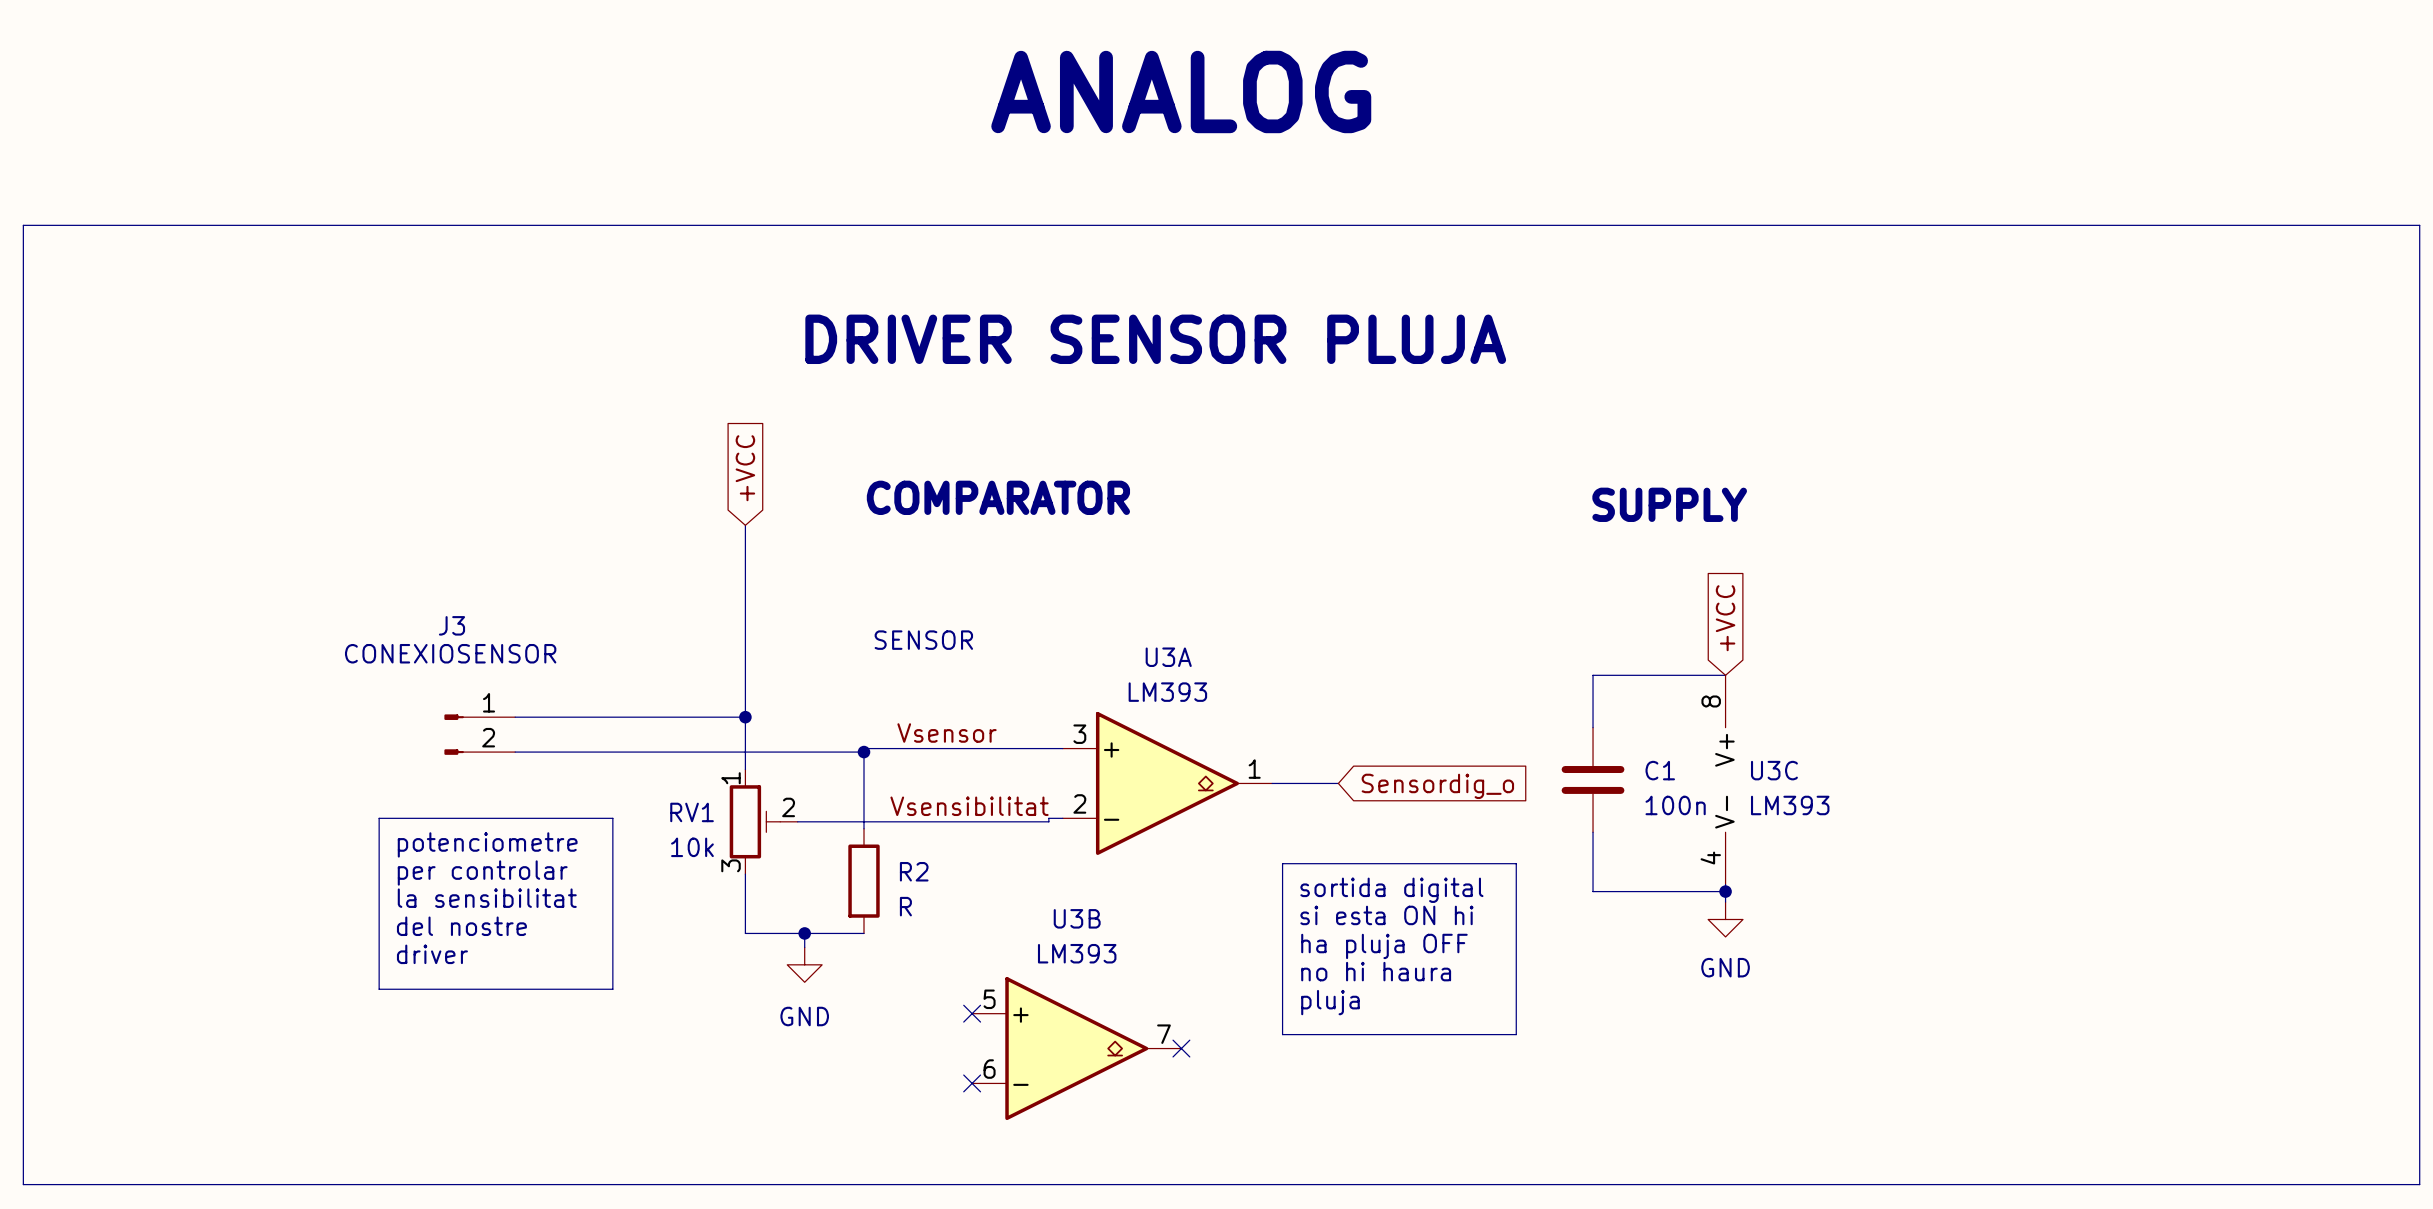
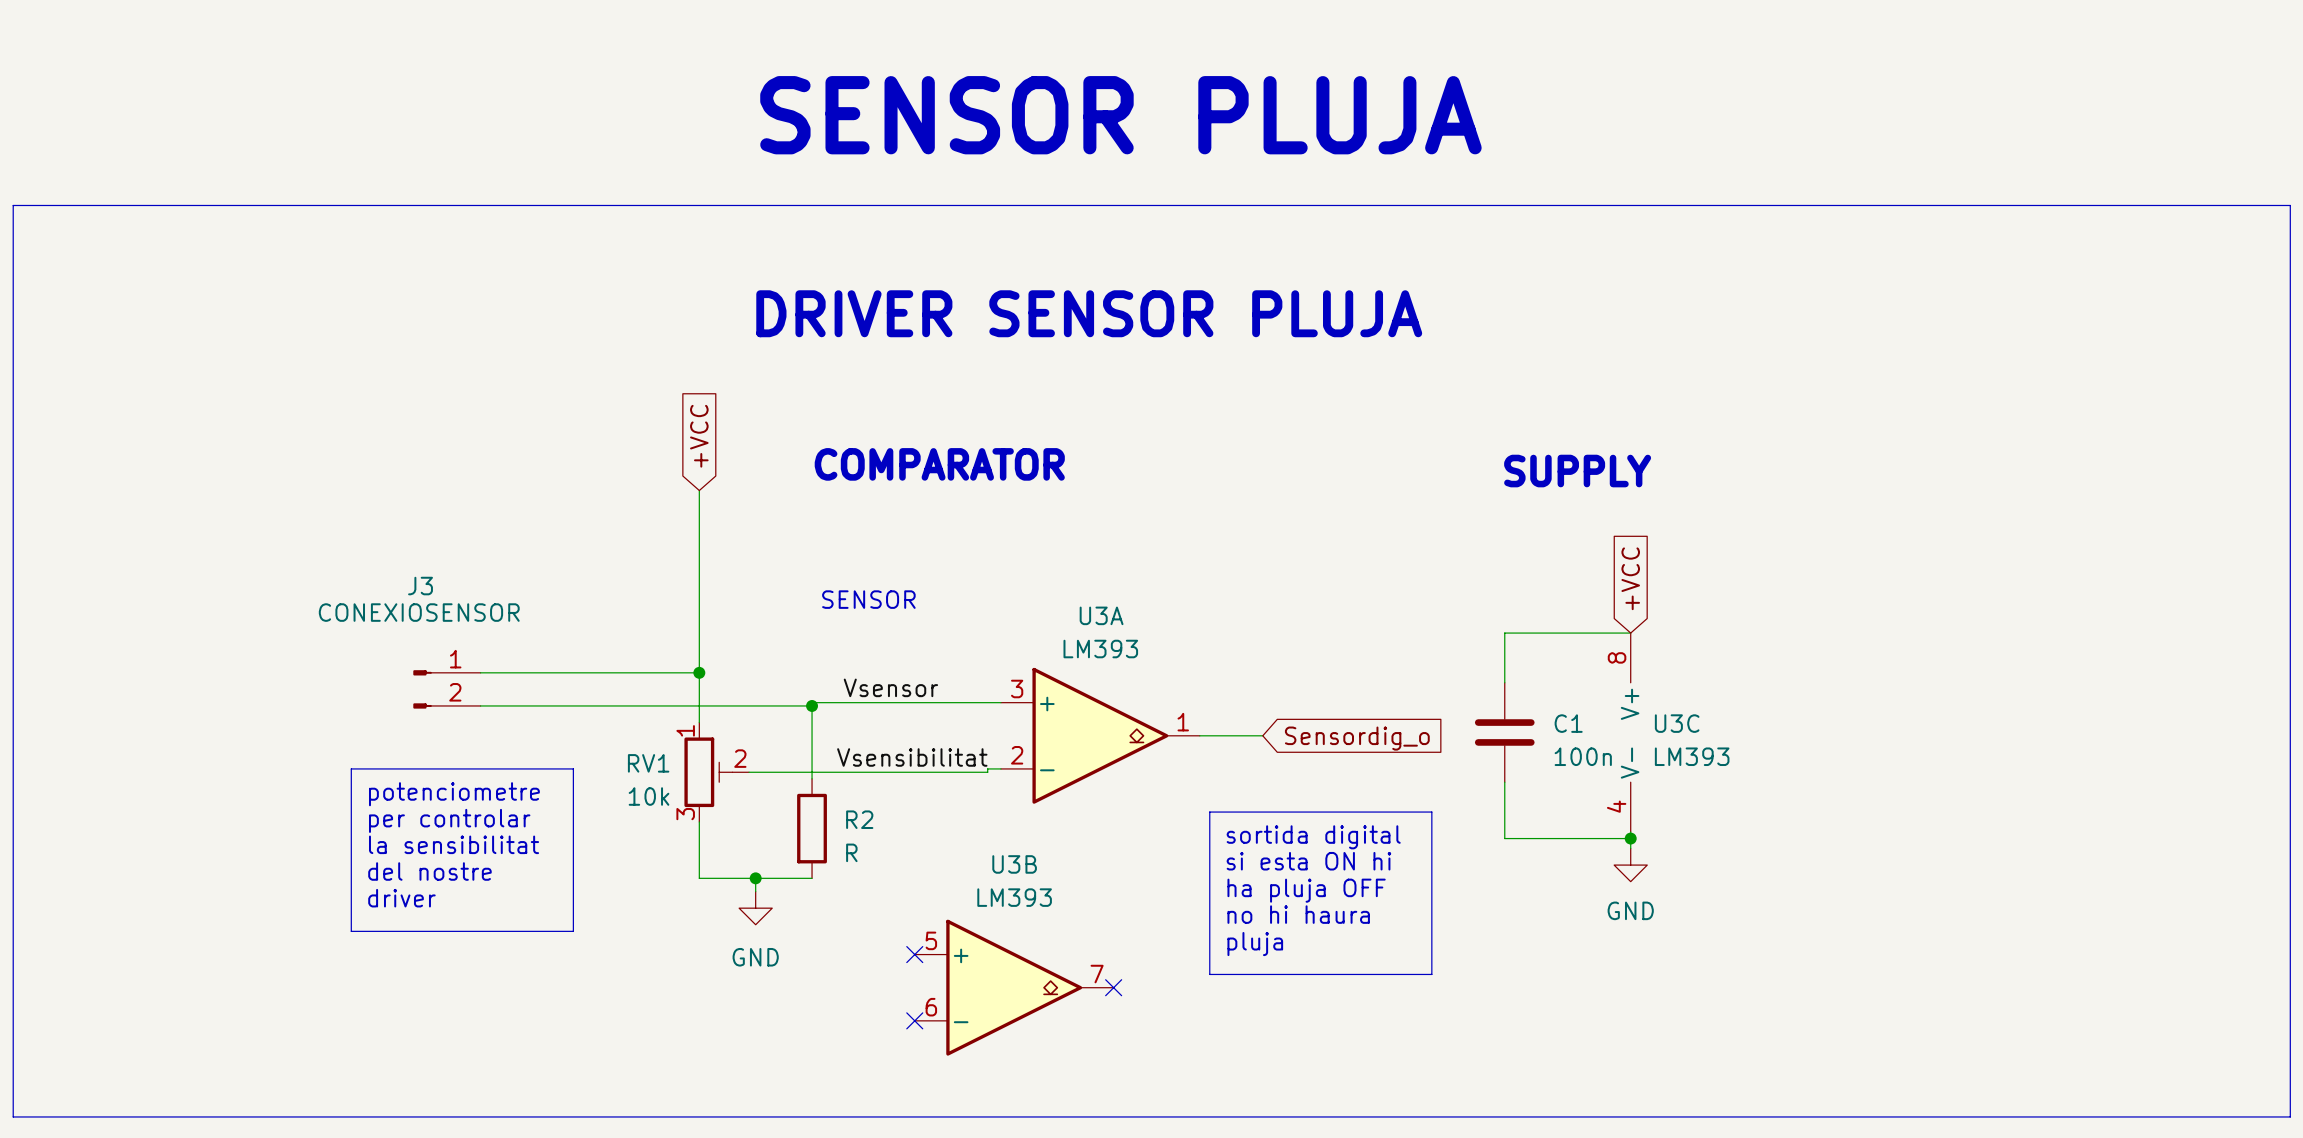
text: ANALOG (1181, 91) -> none
text: none -> SENSOR PLUJA (1120, 115)

